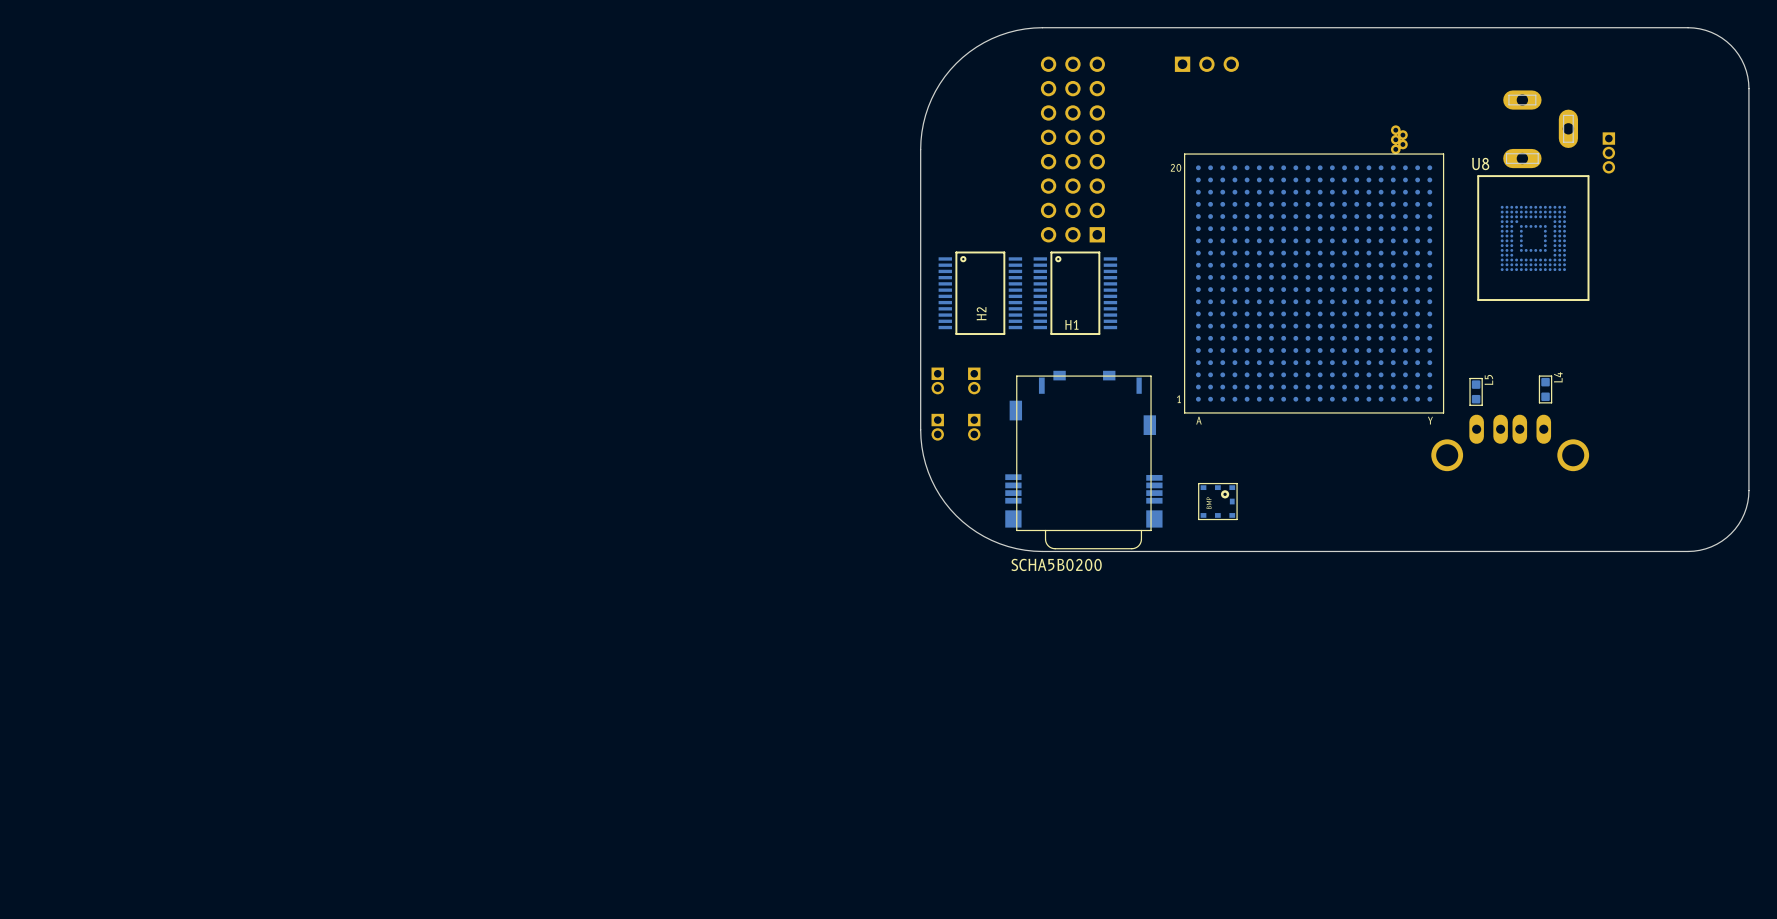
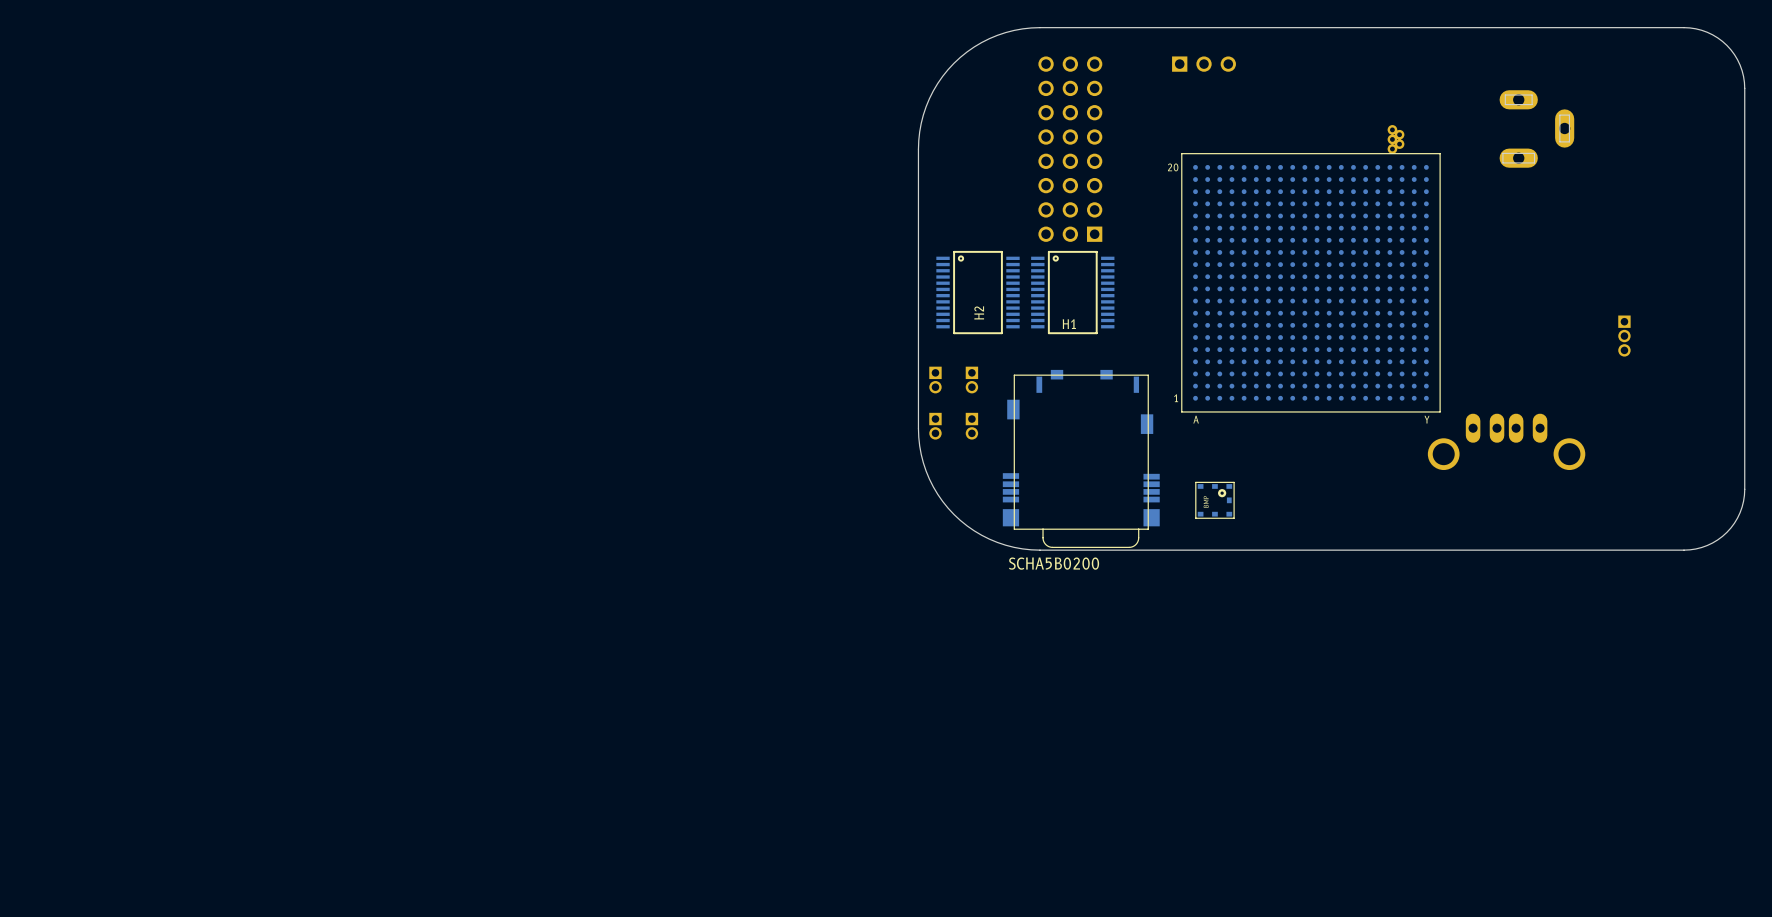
part position: (1608, 152) -> (1624, 336)
U8: (1533, 238) -> none
L4: (1545, 389) -> none
L5: (1476, 391) -> none

